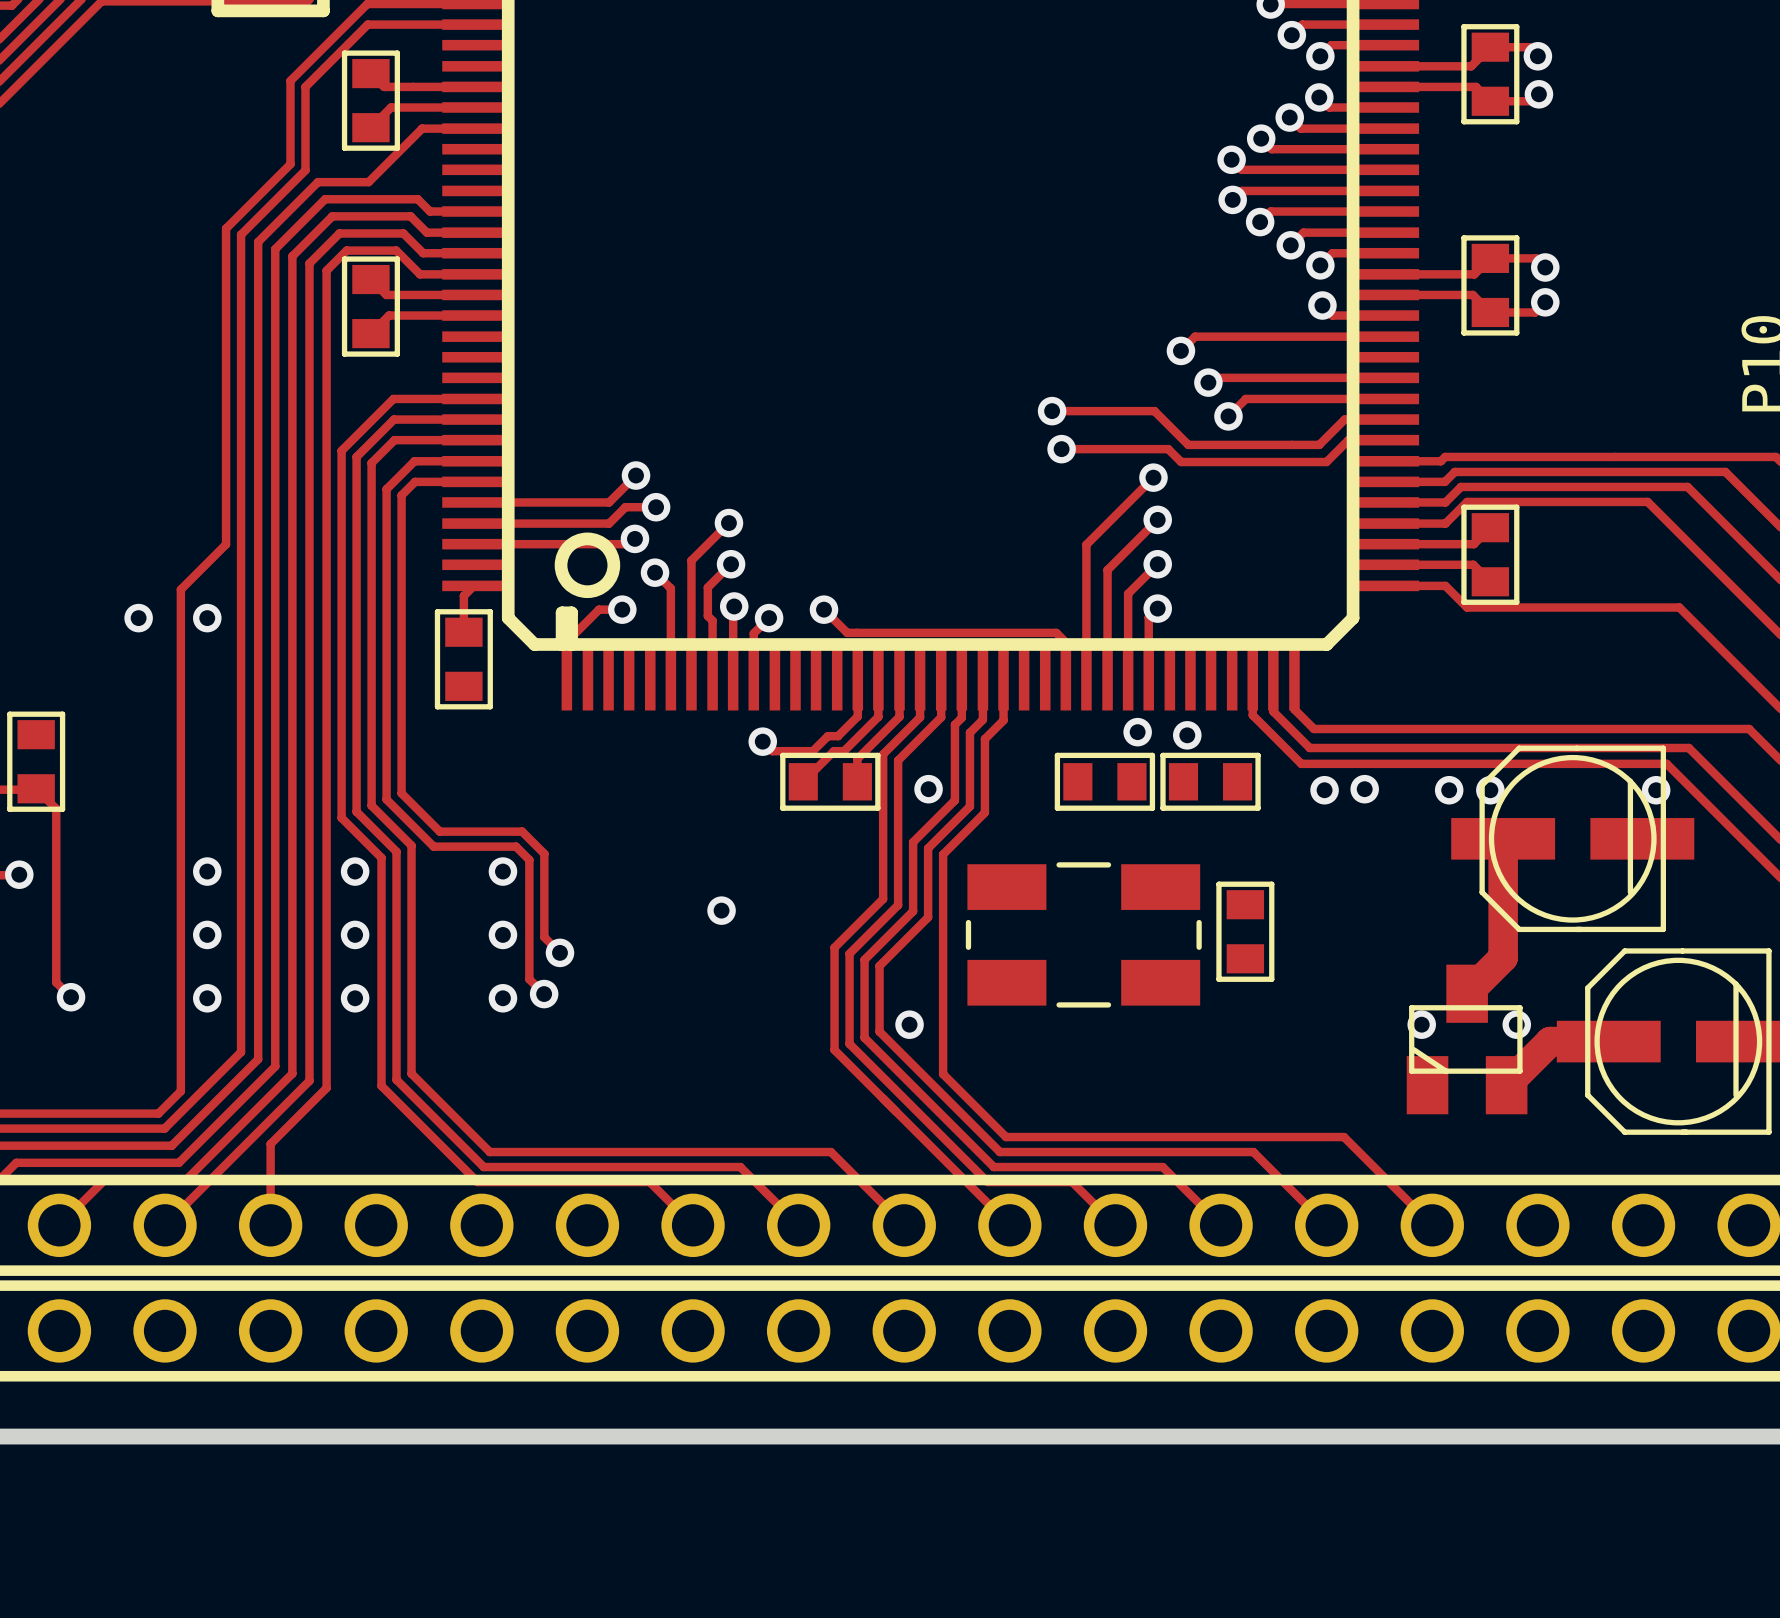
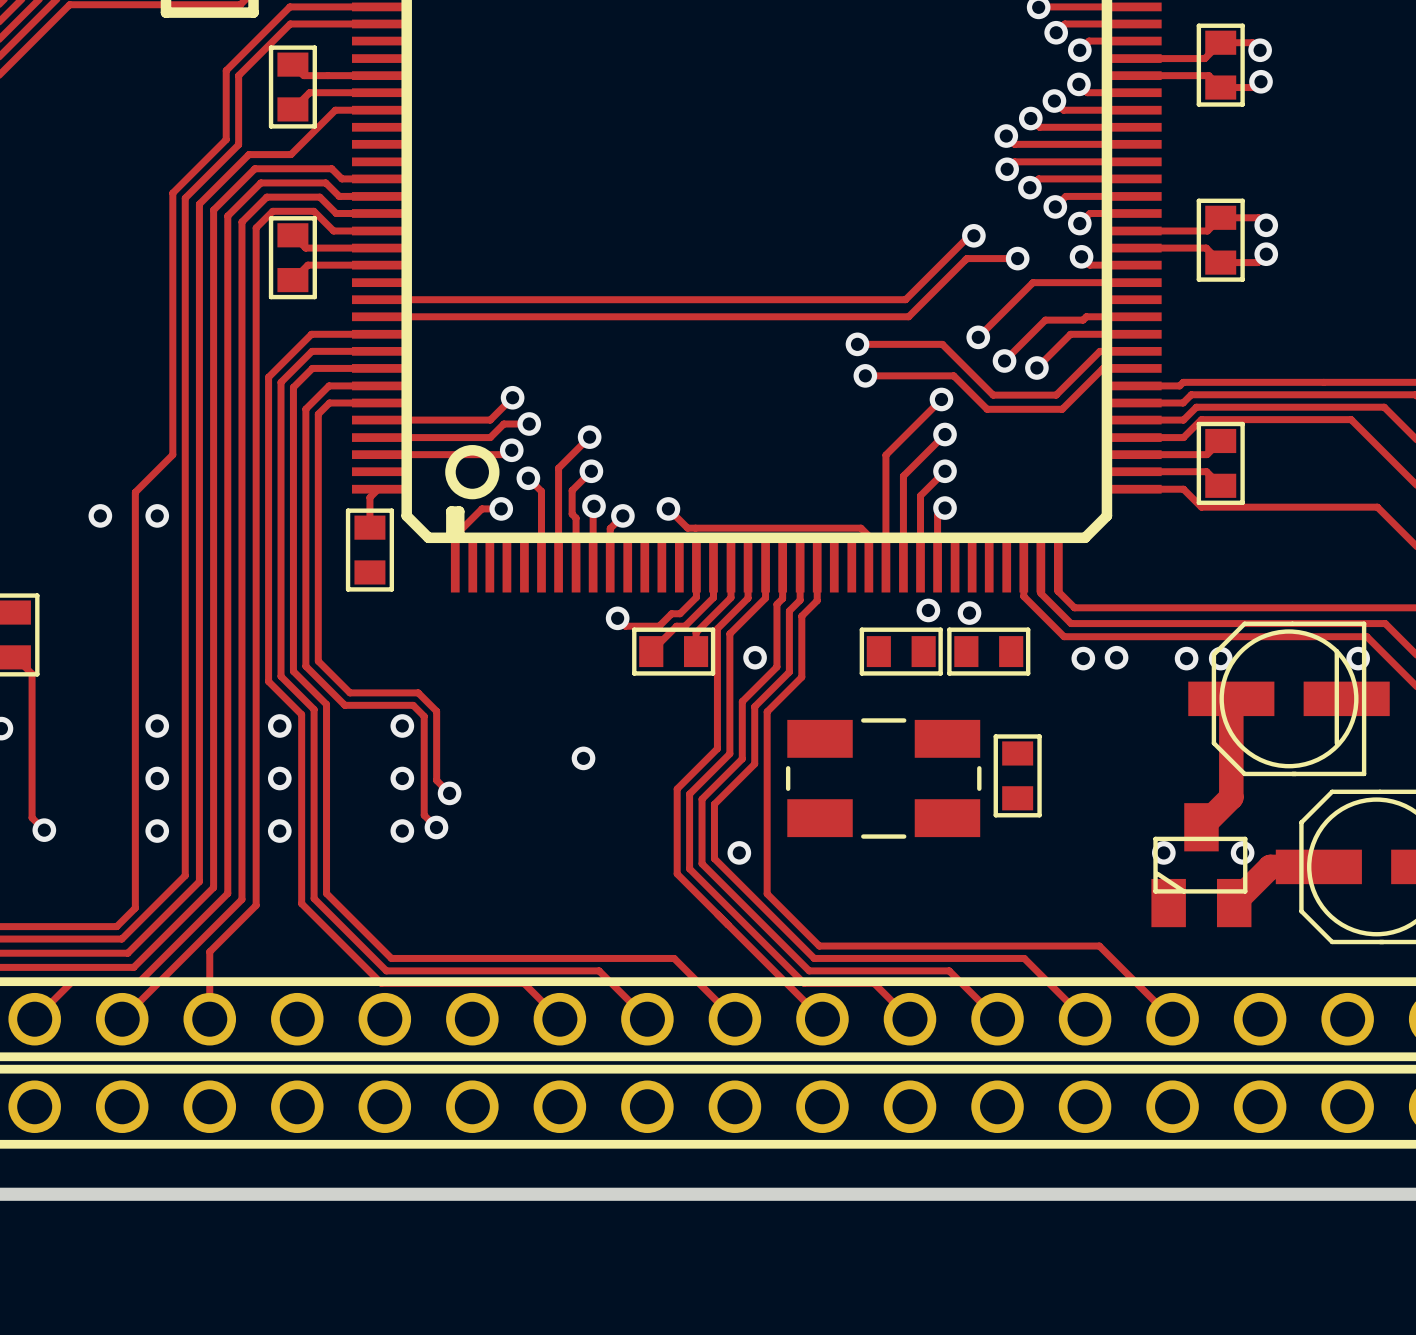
track: none -> (973, 235) (969, 235) (905, 299) (378, 299)
via: none -> (973, 235)
track: none -> (1017, 258) (966, 258) (908, 316) (378, 316)
via: none -> (1017, 258)
track: (1263, 336) (1195, 336) (1180, 350) -> (1032, 282) (978, 337)
via: (1180, 350) -> none
track: (1328, 377) (1213, 377) (1208, 382) -> (1086, 316) (1083, 320) (1045, 320) (1004, 360)
via position: (1208, 382) -> (978, 337)
track: (1309, 398) (1245, 398) (1228, 416) -> (1070, 334) (1036, 367)
via position: (1228, 416) -> (1004, 360)
via: none -> (1036, 367)
track: (1188, 444) (1319, 444) -> (970, 372) (993, 395) (1056, 395) (1078, 372)
track: (1181, 462) (1326, 462) -> (964, 386) (987, 409) (1062, 409) (1084, 386)

